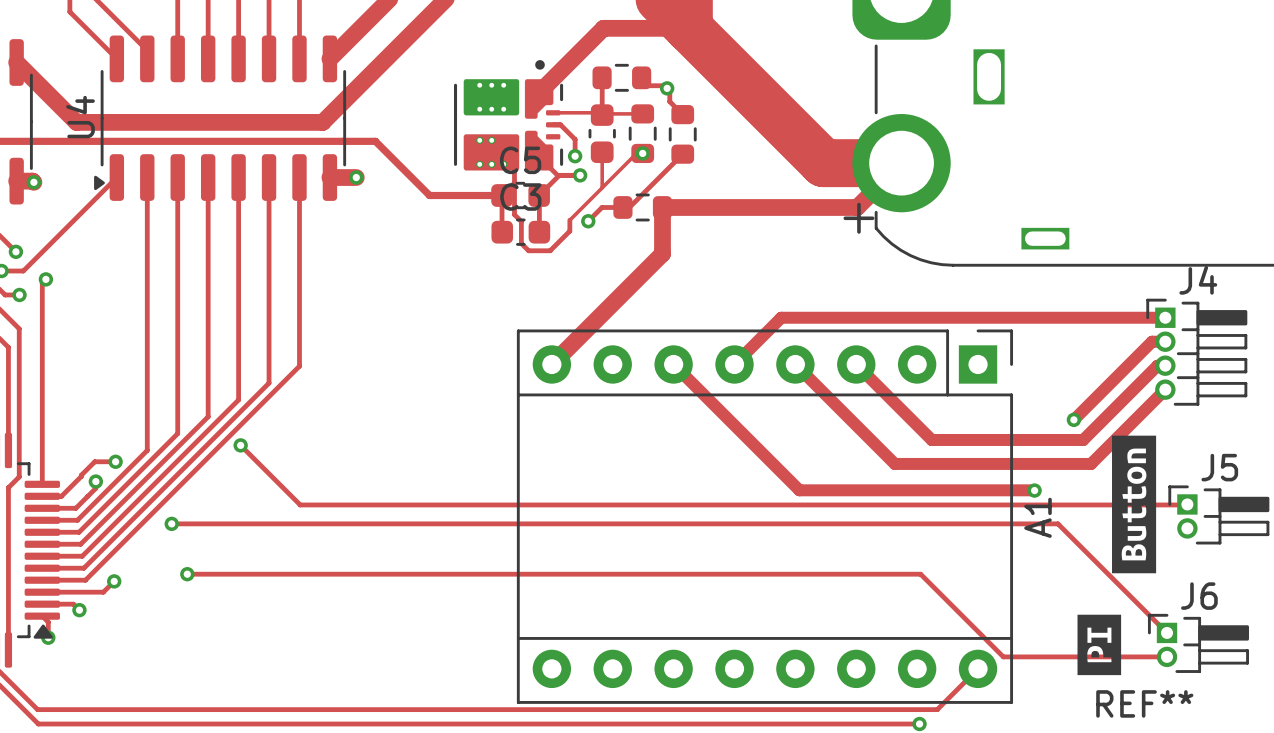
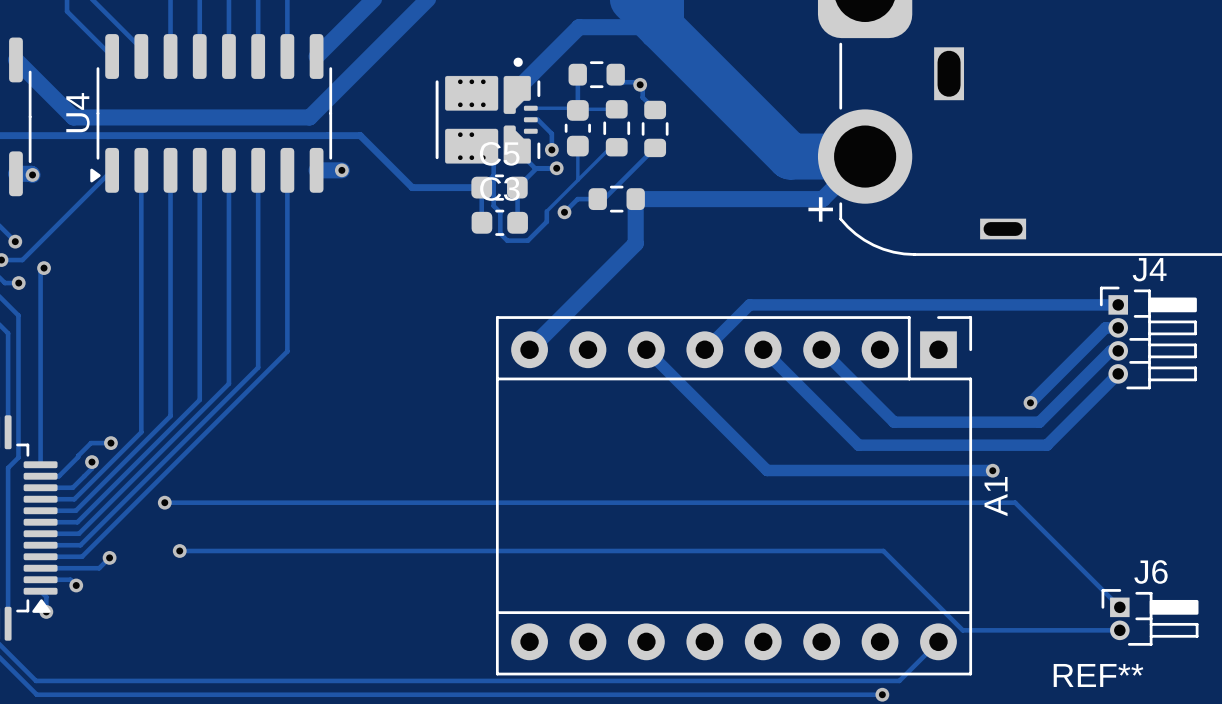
via: (642, 153) -> none
drawing: [1112, 435, 1157, 574] -> none
track: (240, 445) (300, 504) (1187, 504) -> none
via: (240, 445) -> none
J5: (1218, 514) -> none
drawing: [1077, 614, 1122, 676] -> none

